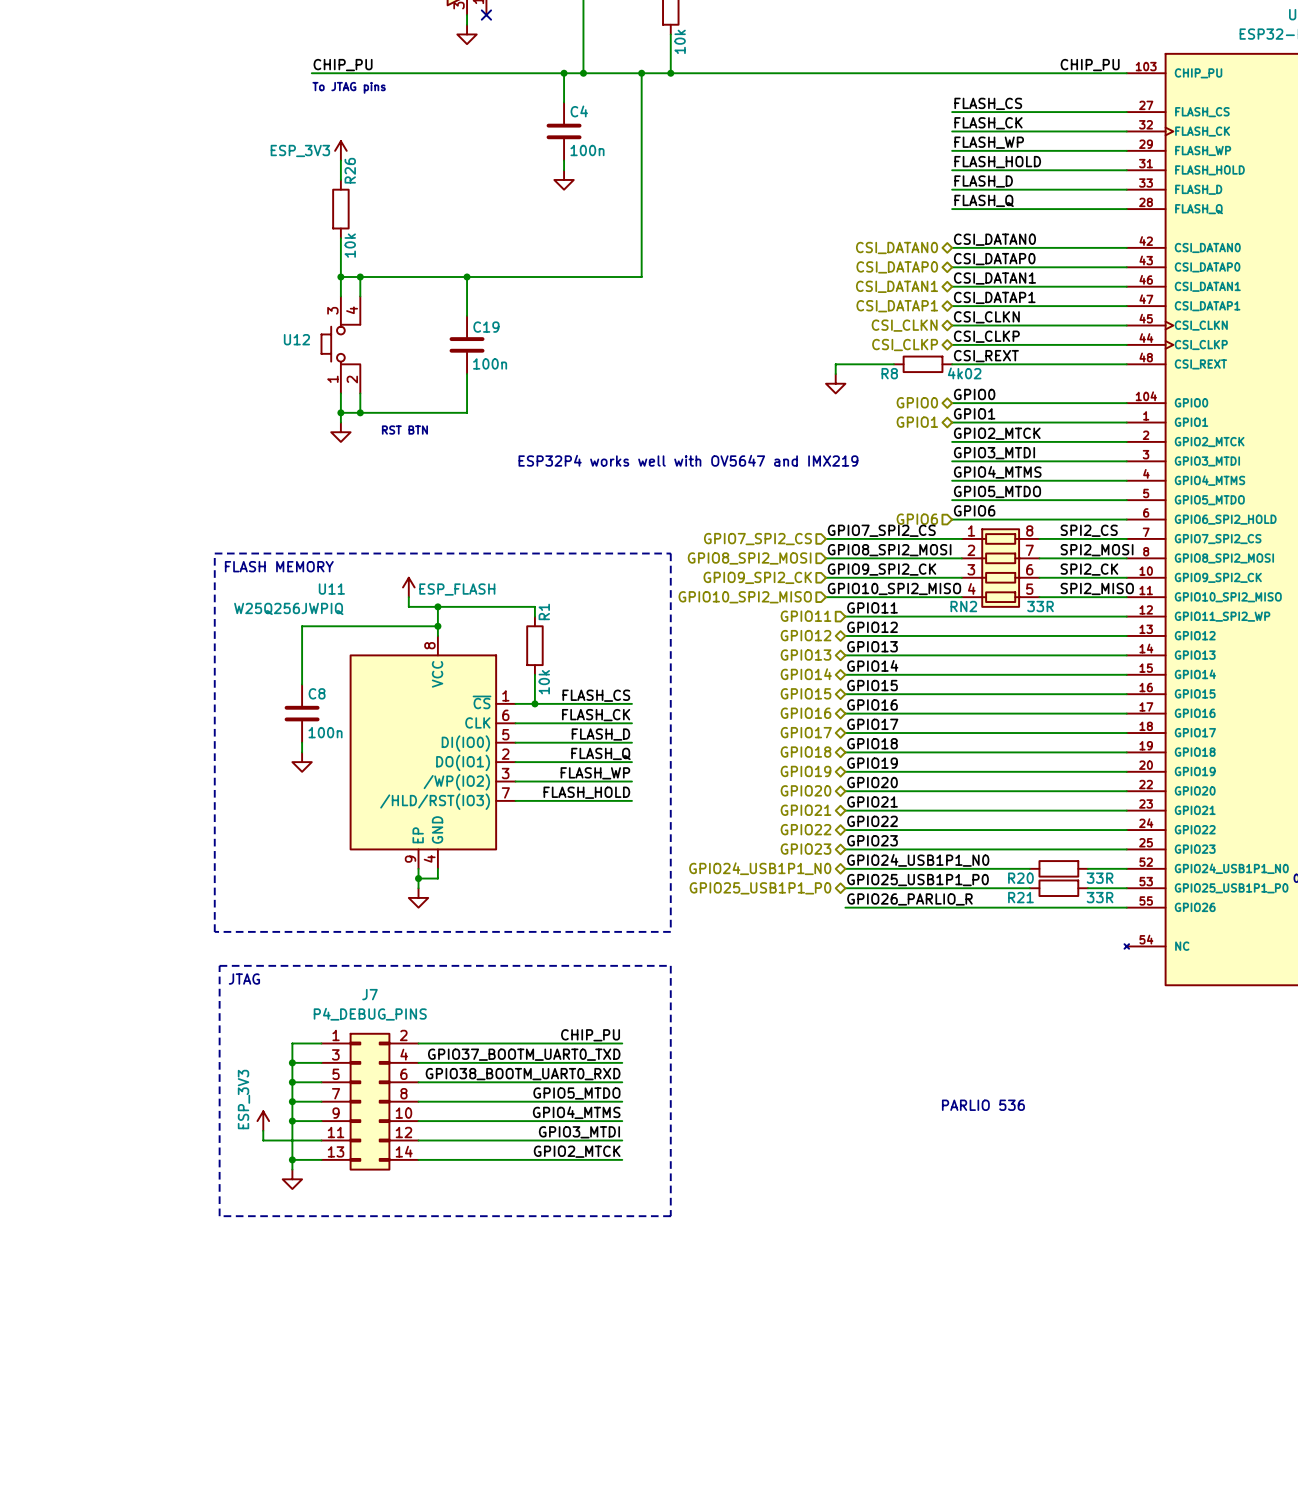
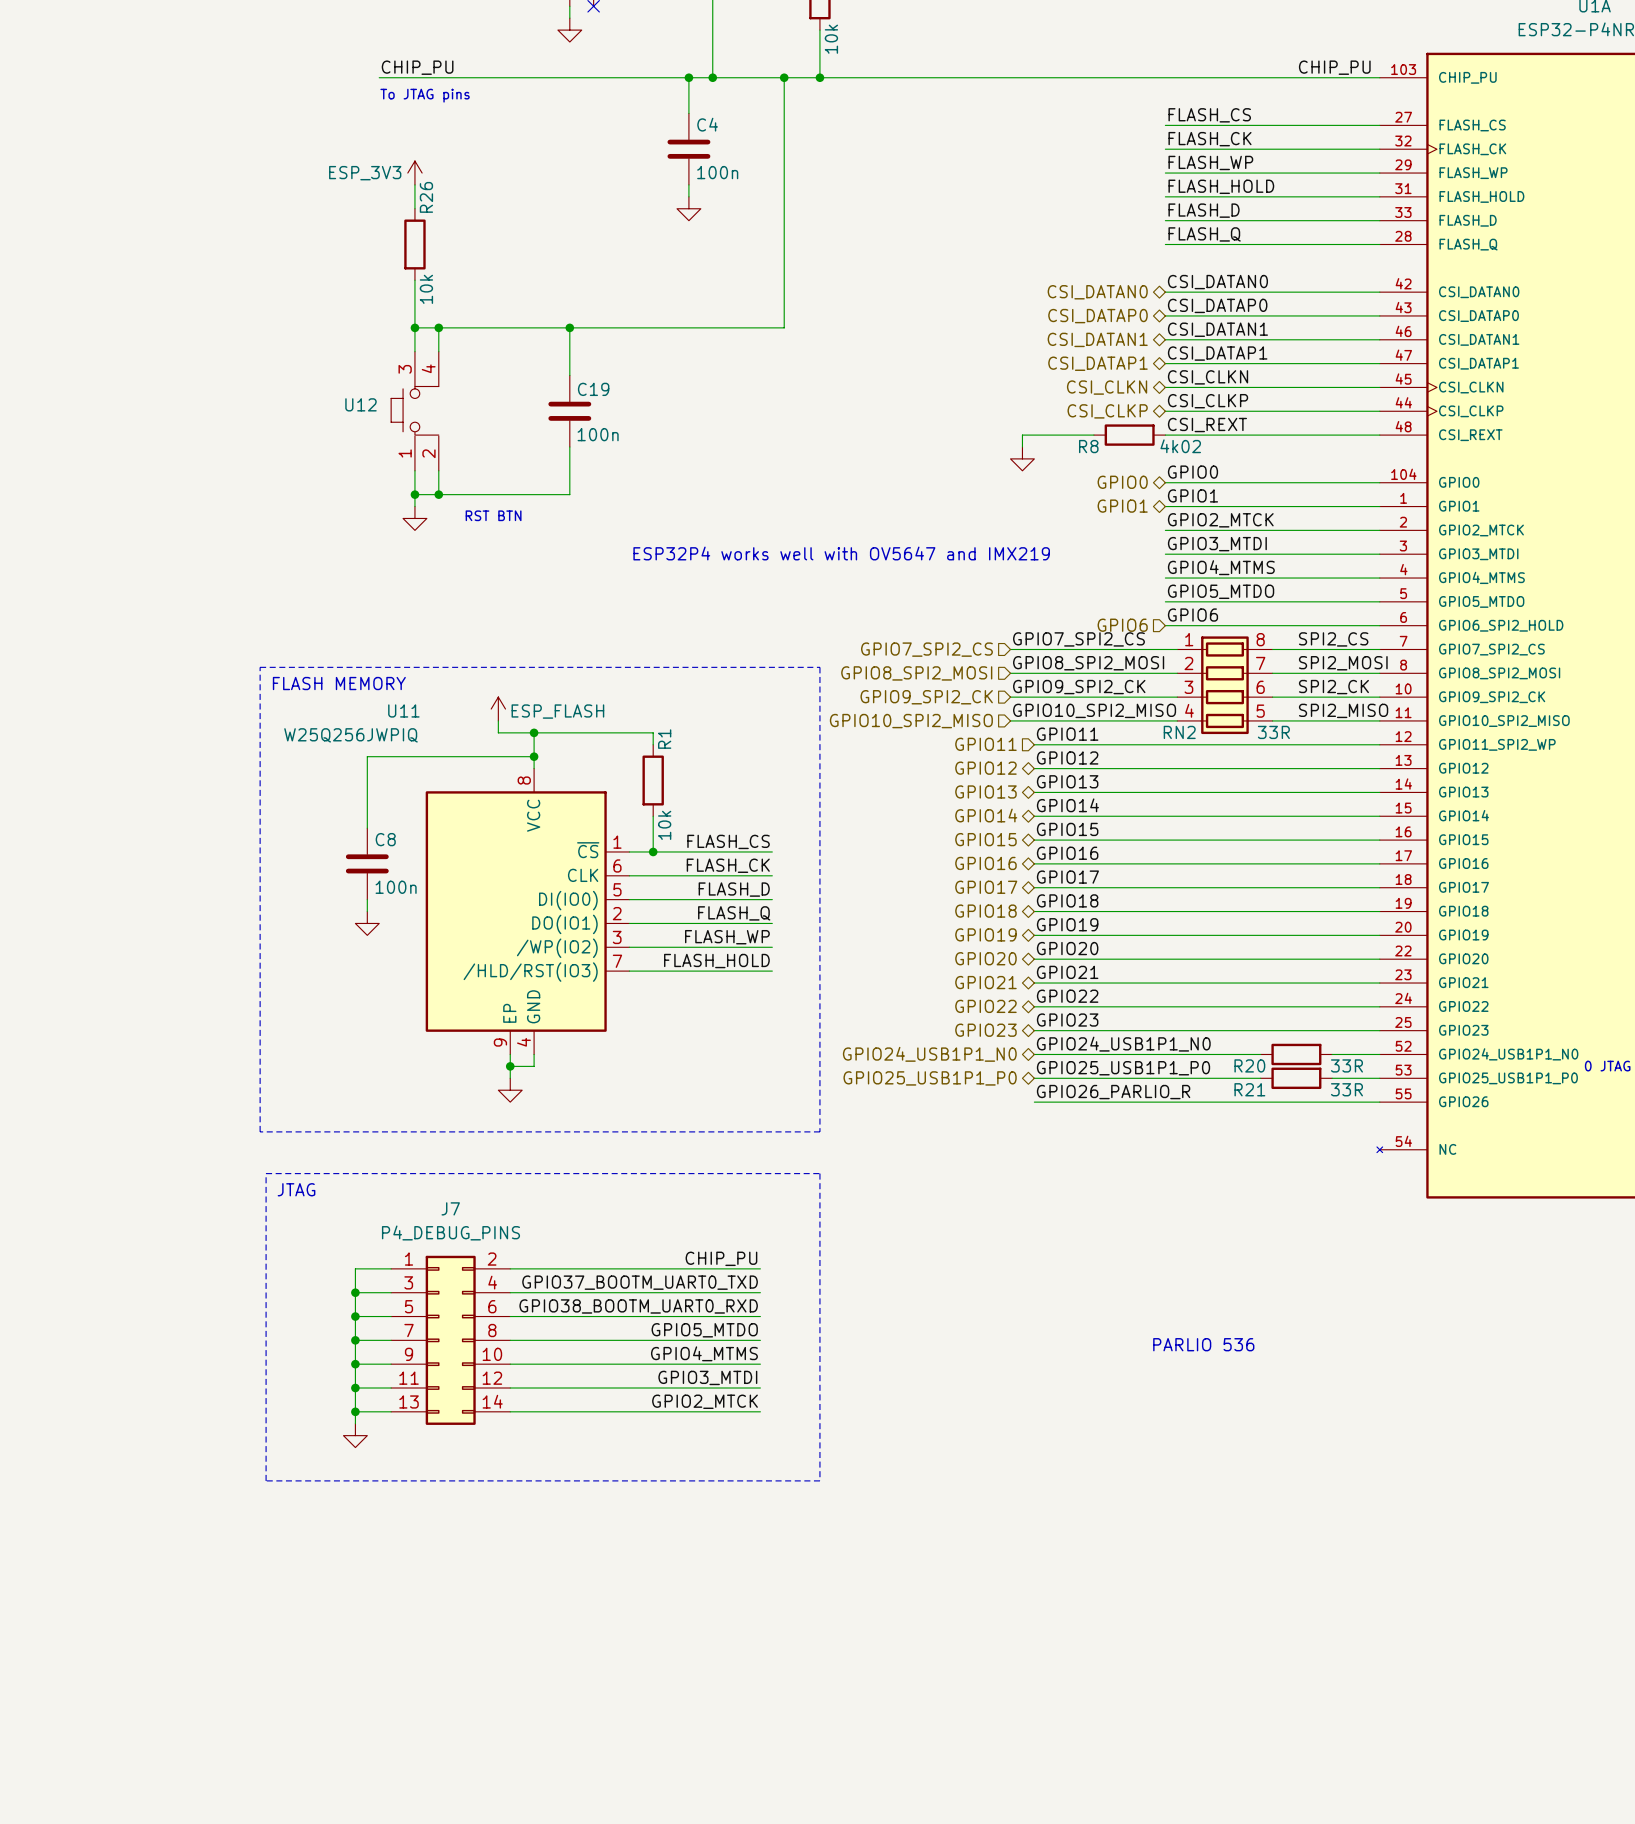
power symbol: ESP_3V3 (263, 1121) -> none
wire: (263, 1130) (263, 1140) (292, 1140) -> none
junction: none -> (355, 1388)

